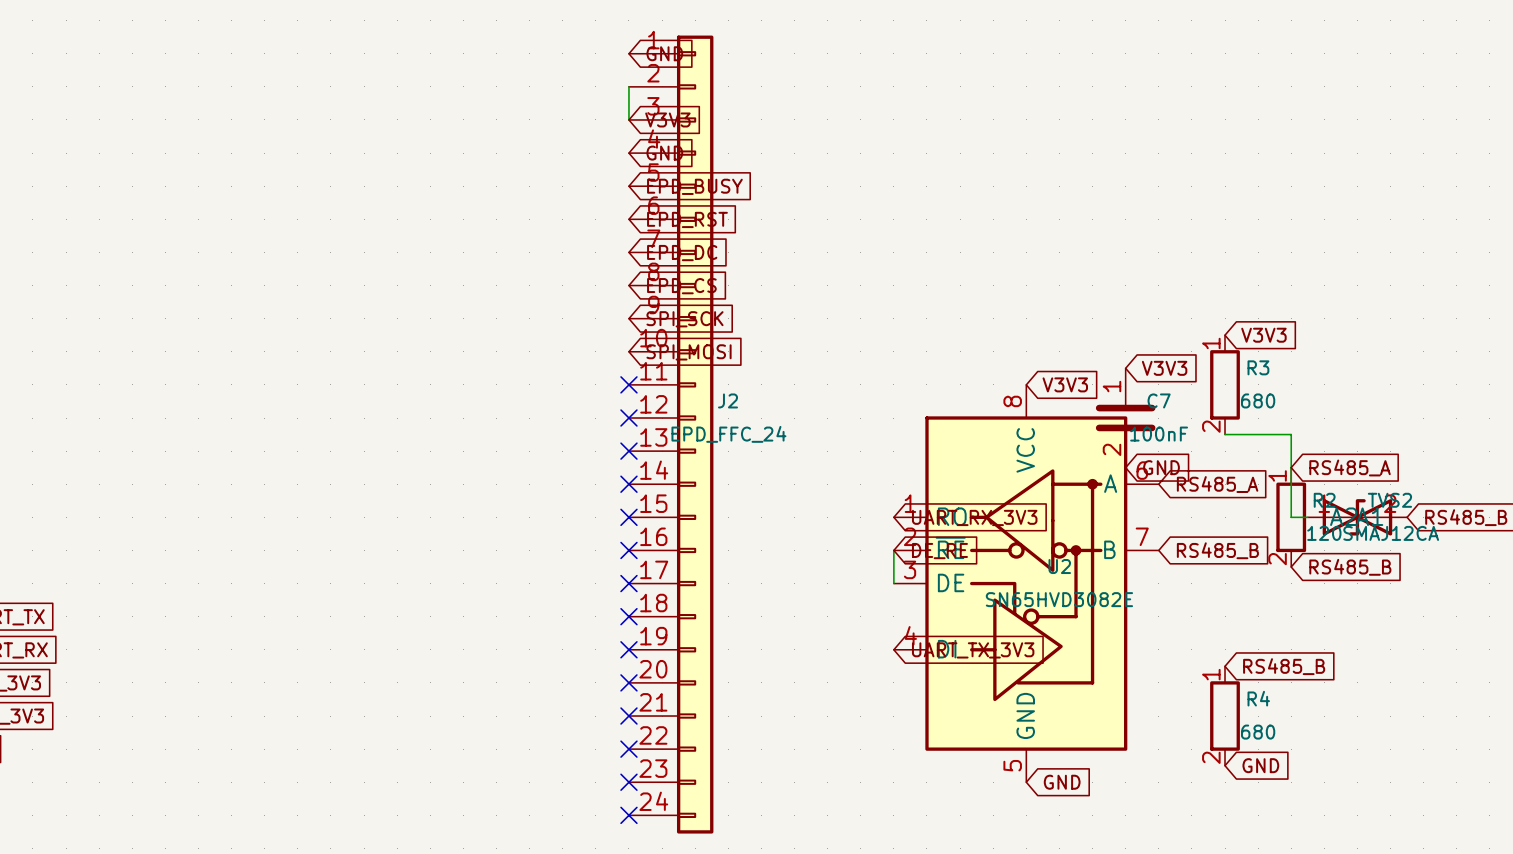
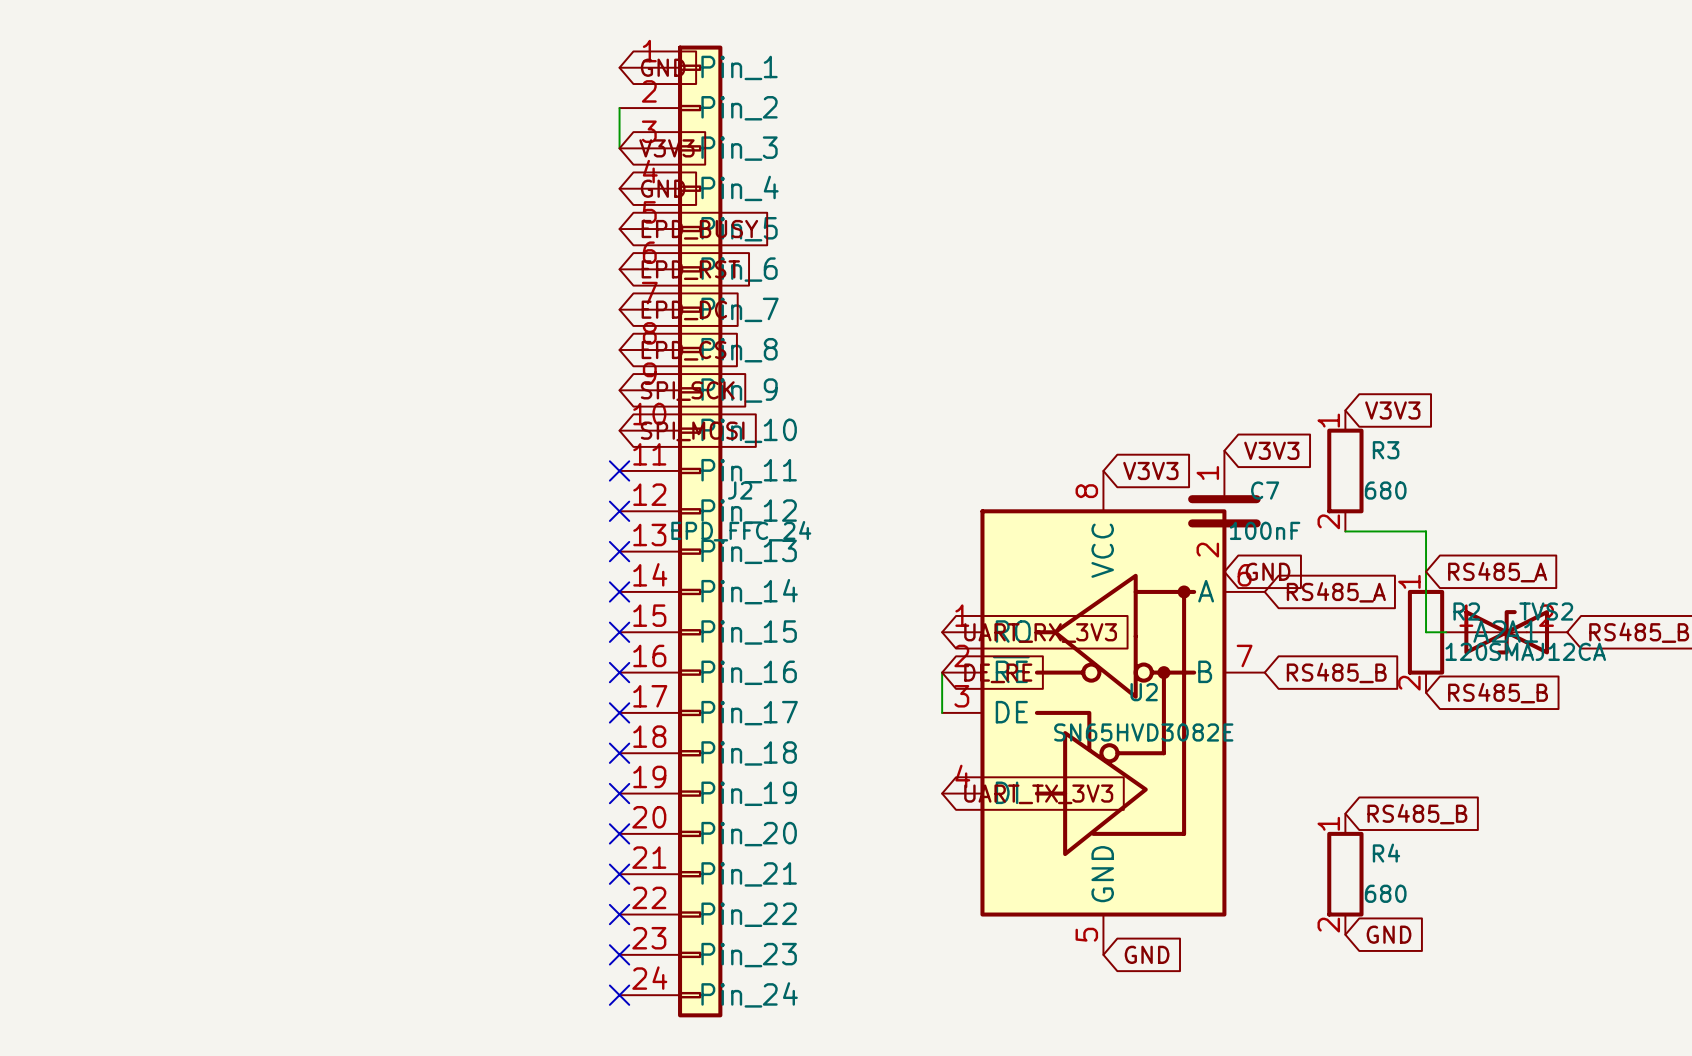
J2 symbol: [628, 35, 714, 834] -> [619, 45, 723, 1018]

